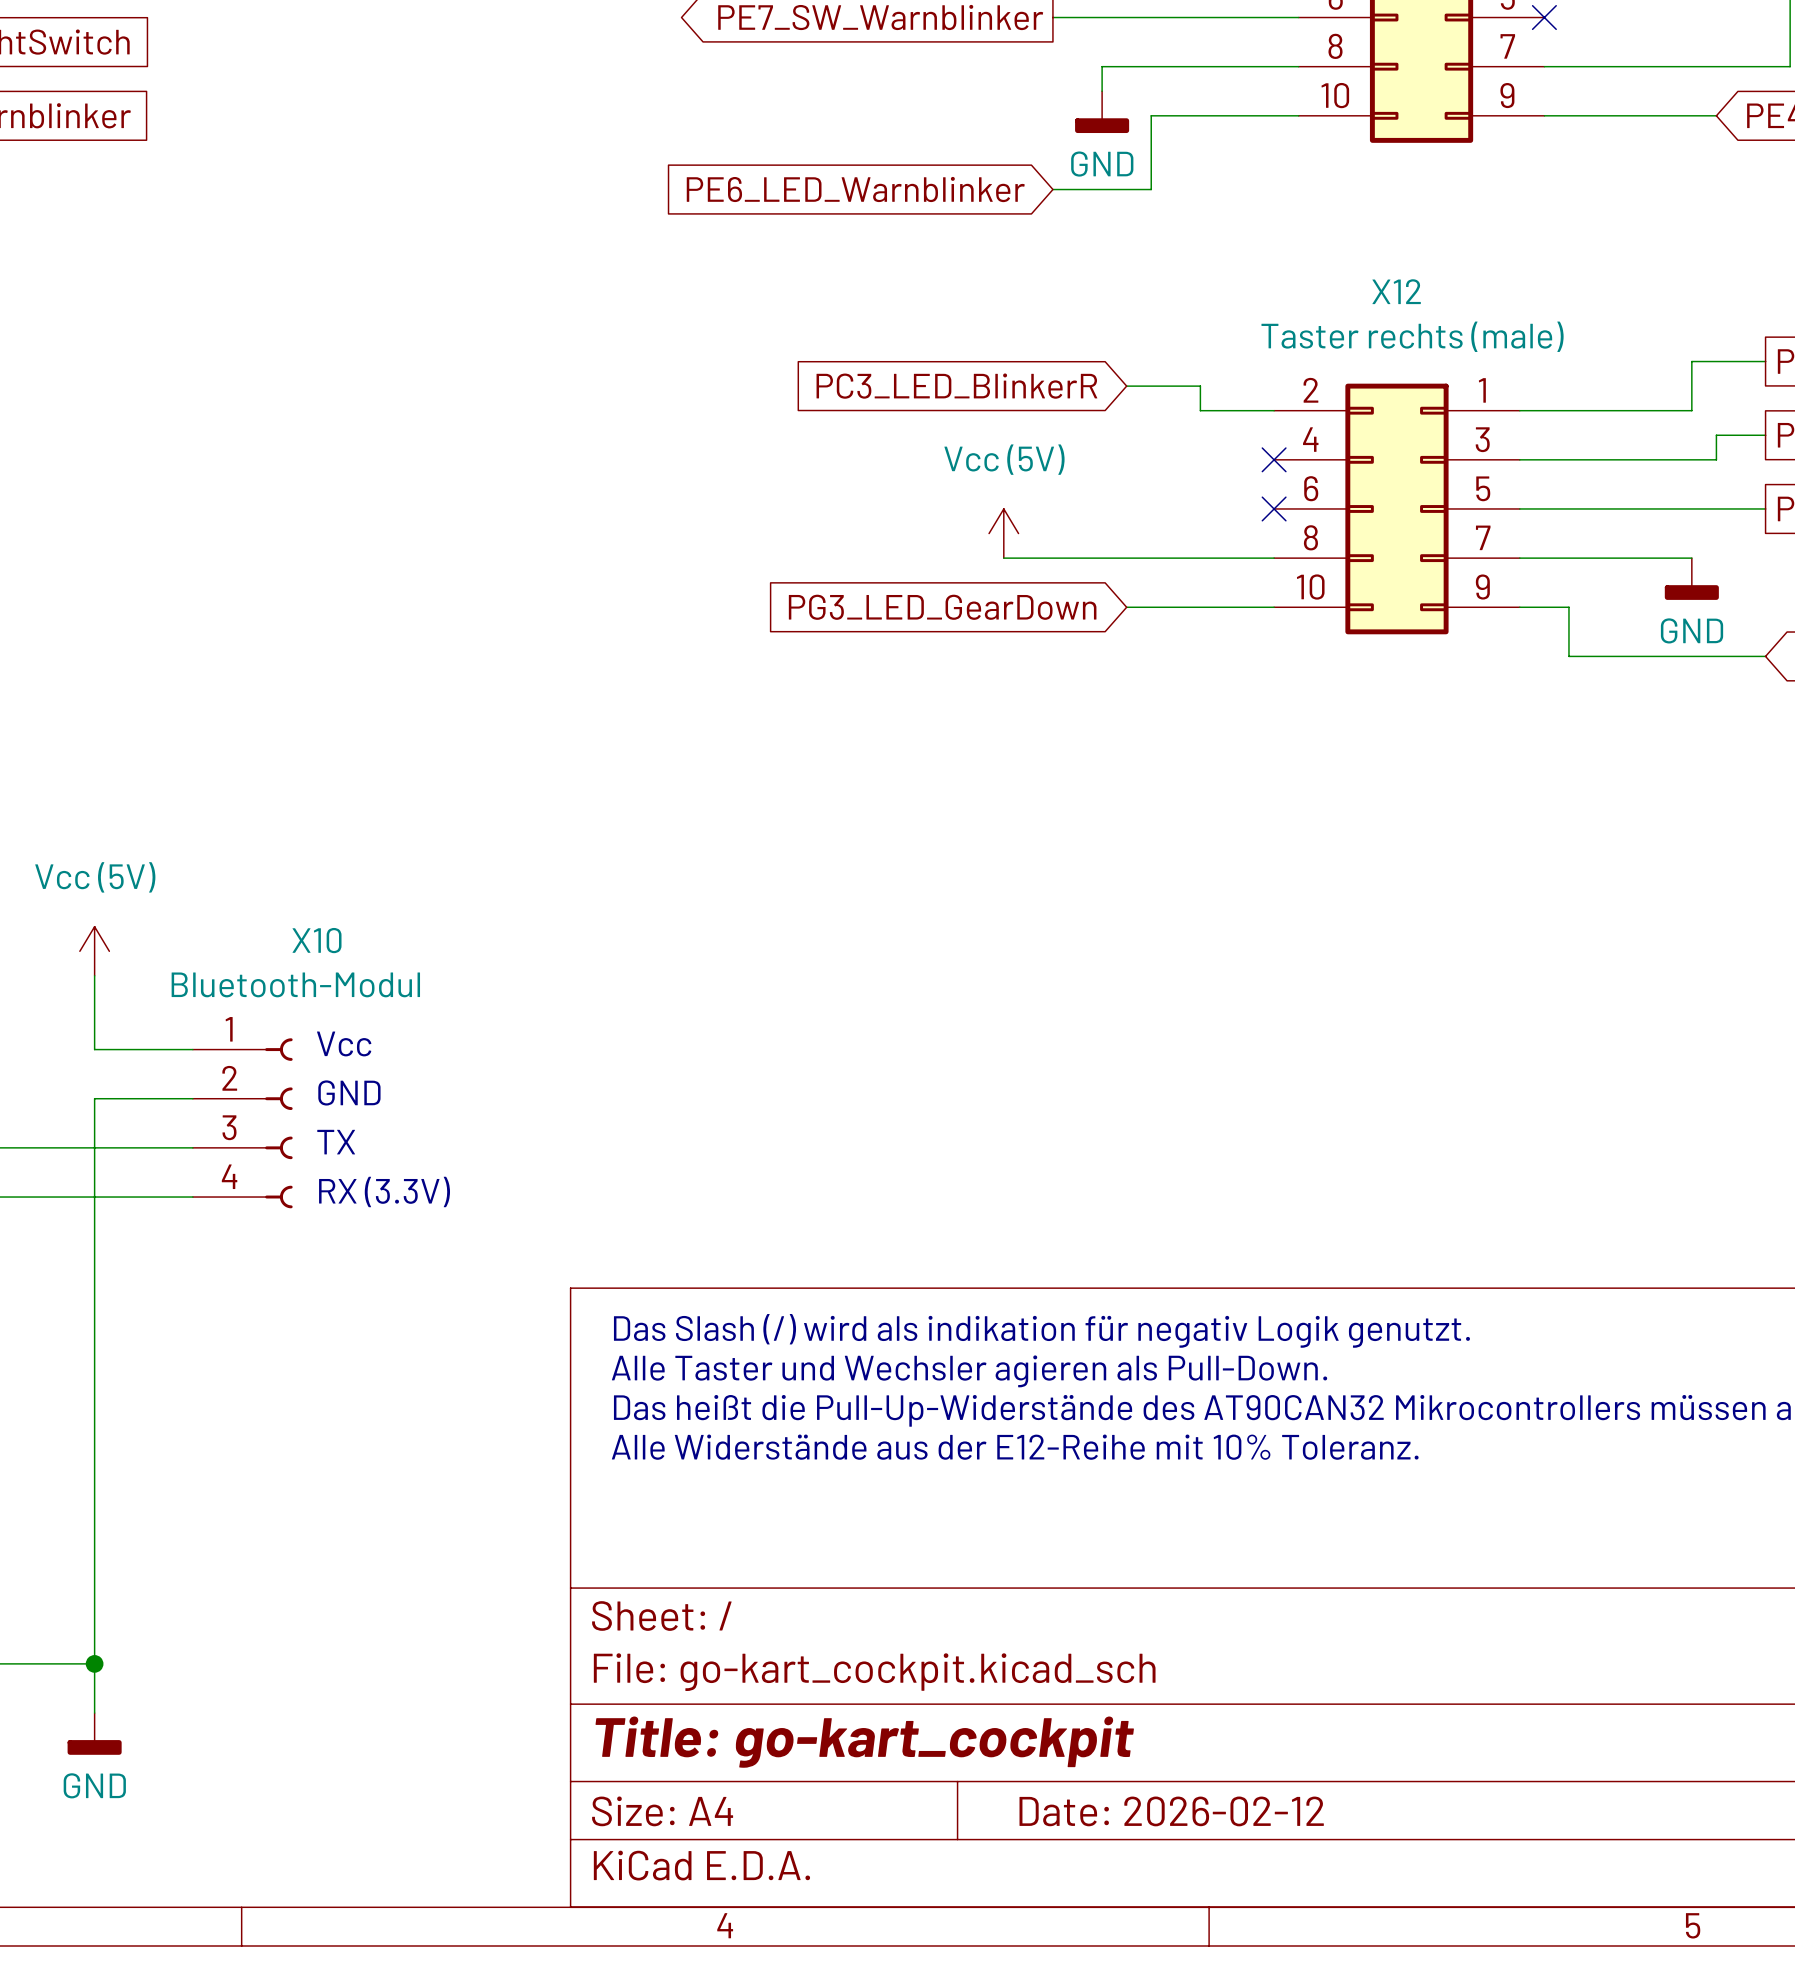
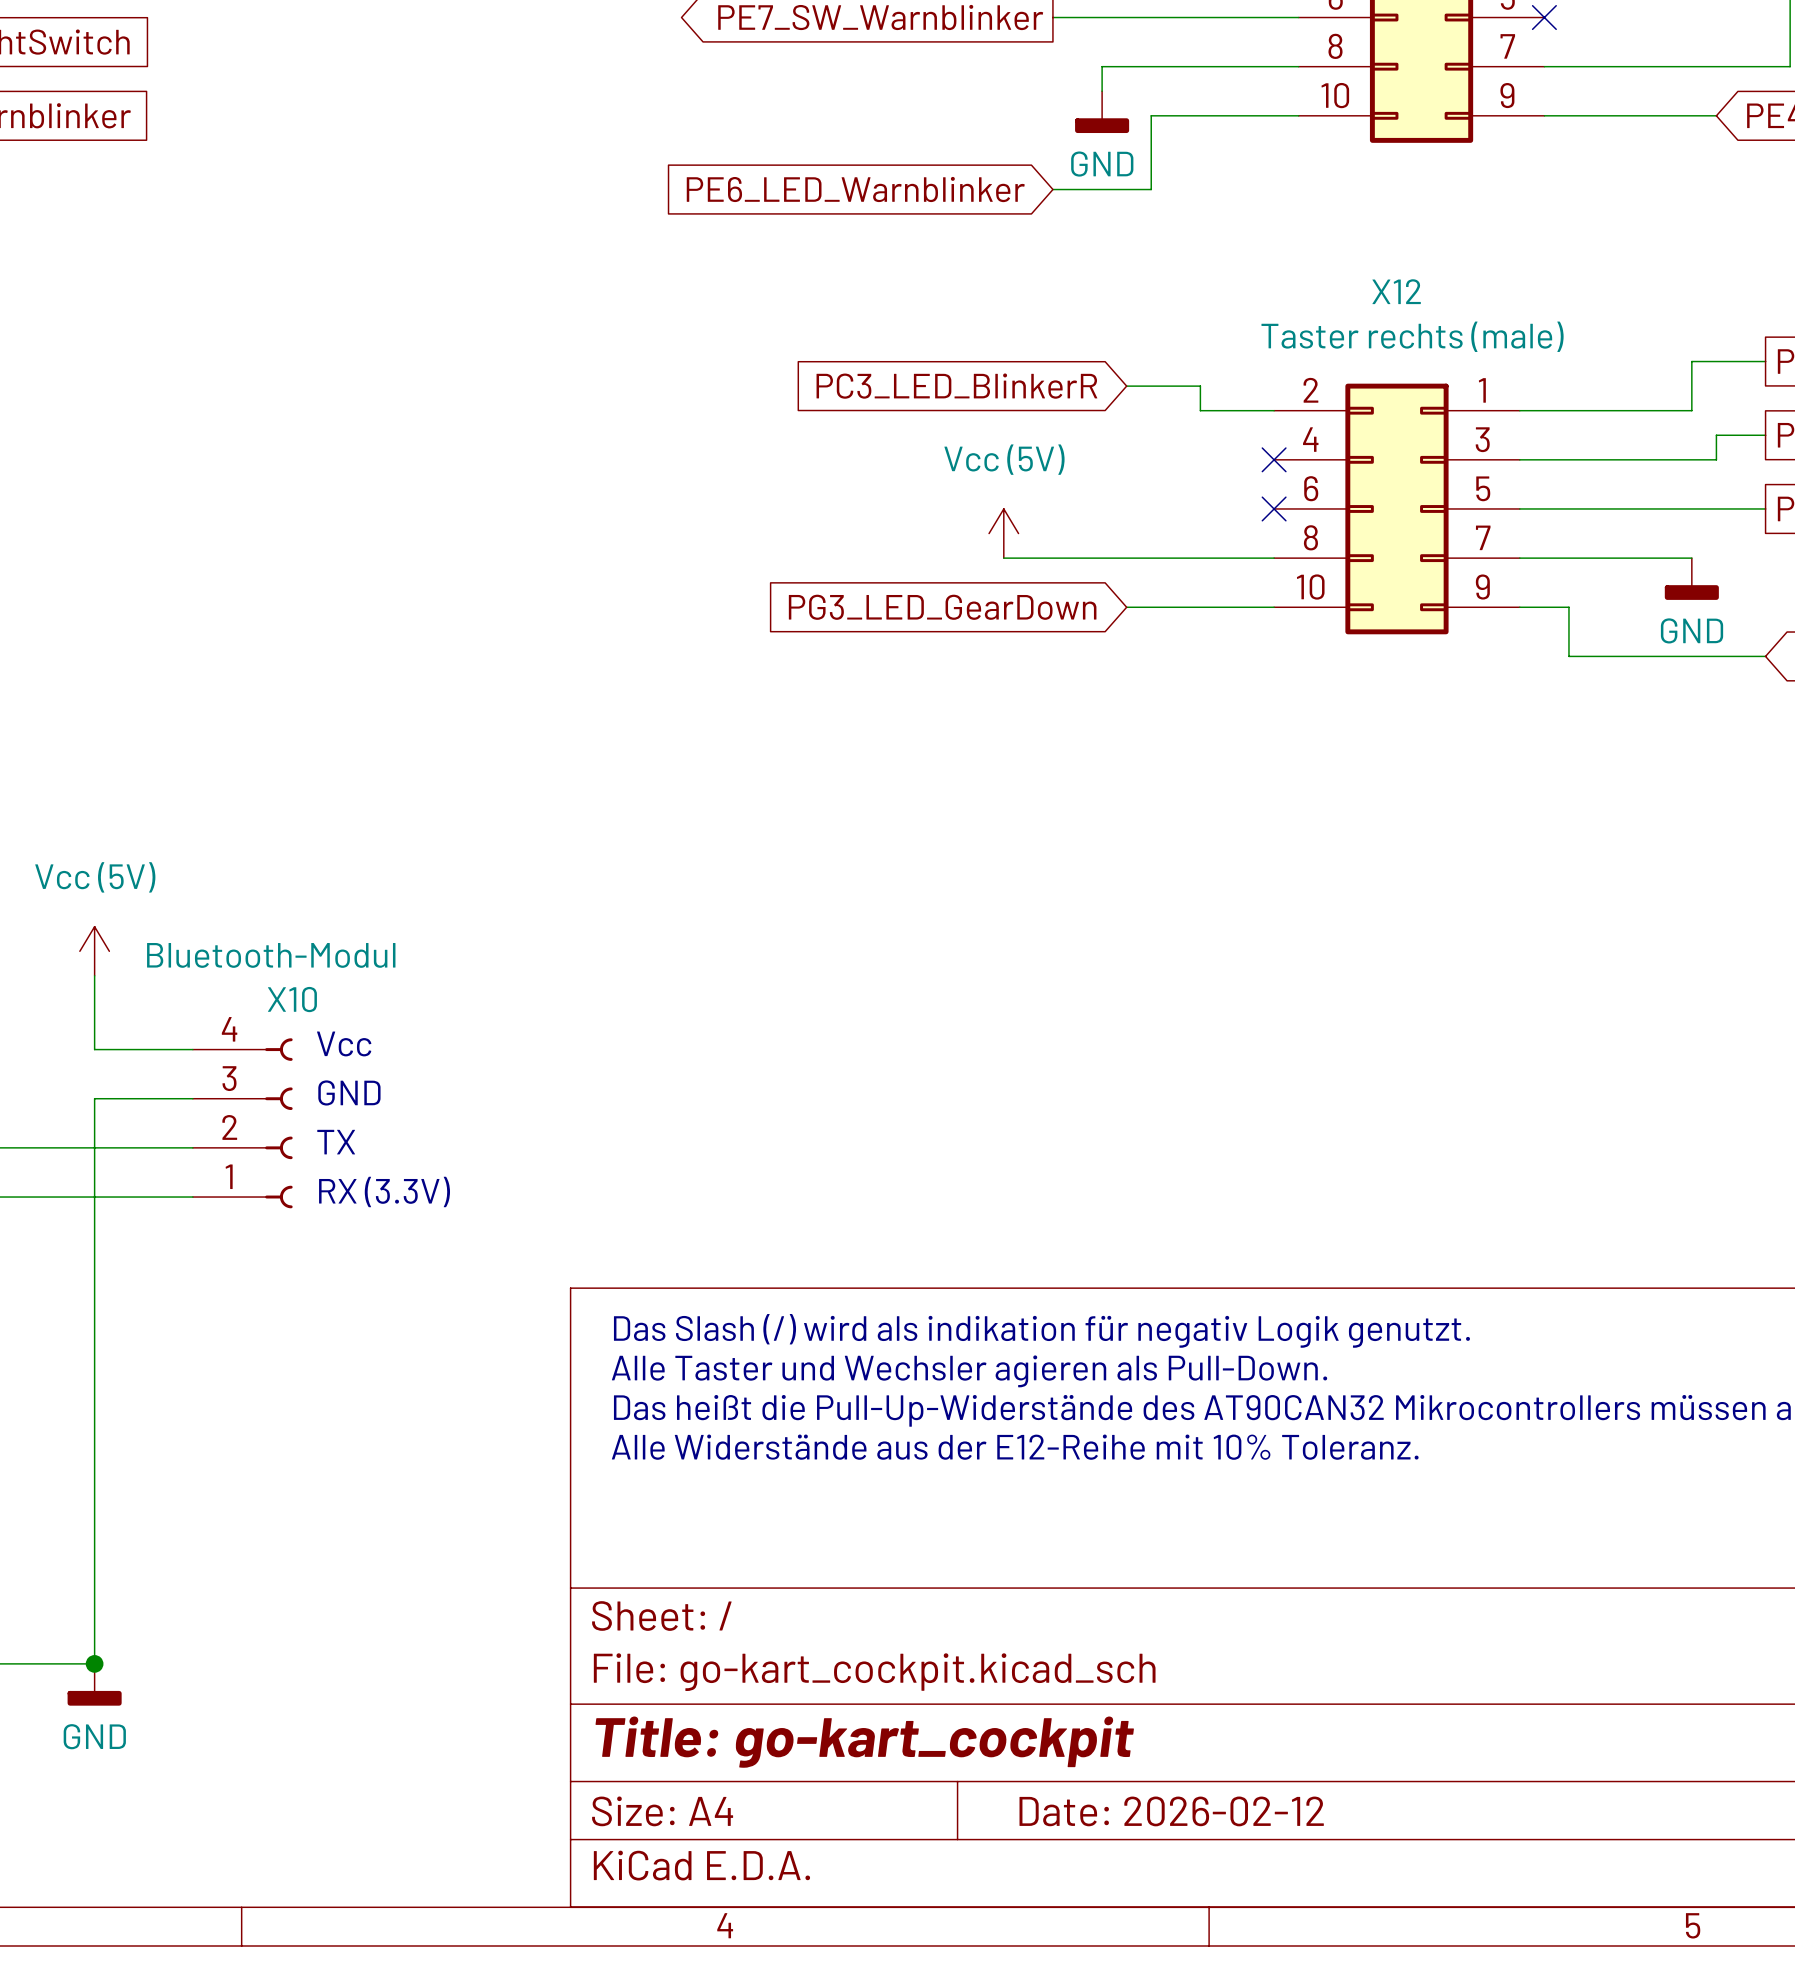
X10 name position: X10 (317, 940) -> X10 (292, 999)
X10 flip: as is (278, 1123) -> up-down (278, 1123)
power symbol position: GND (94, 1733) -> GND (94, 1684)

